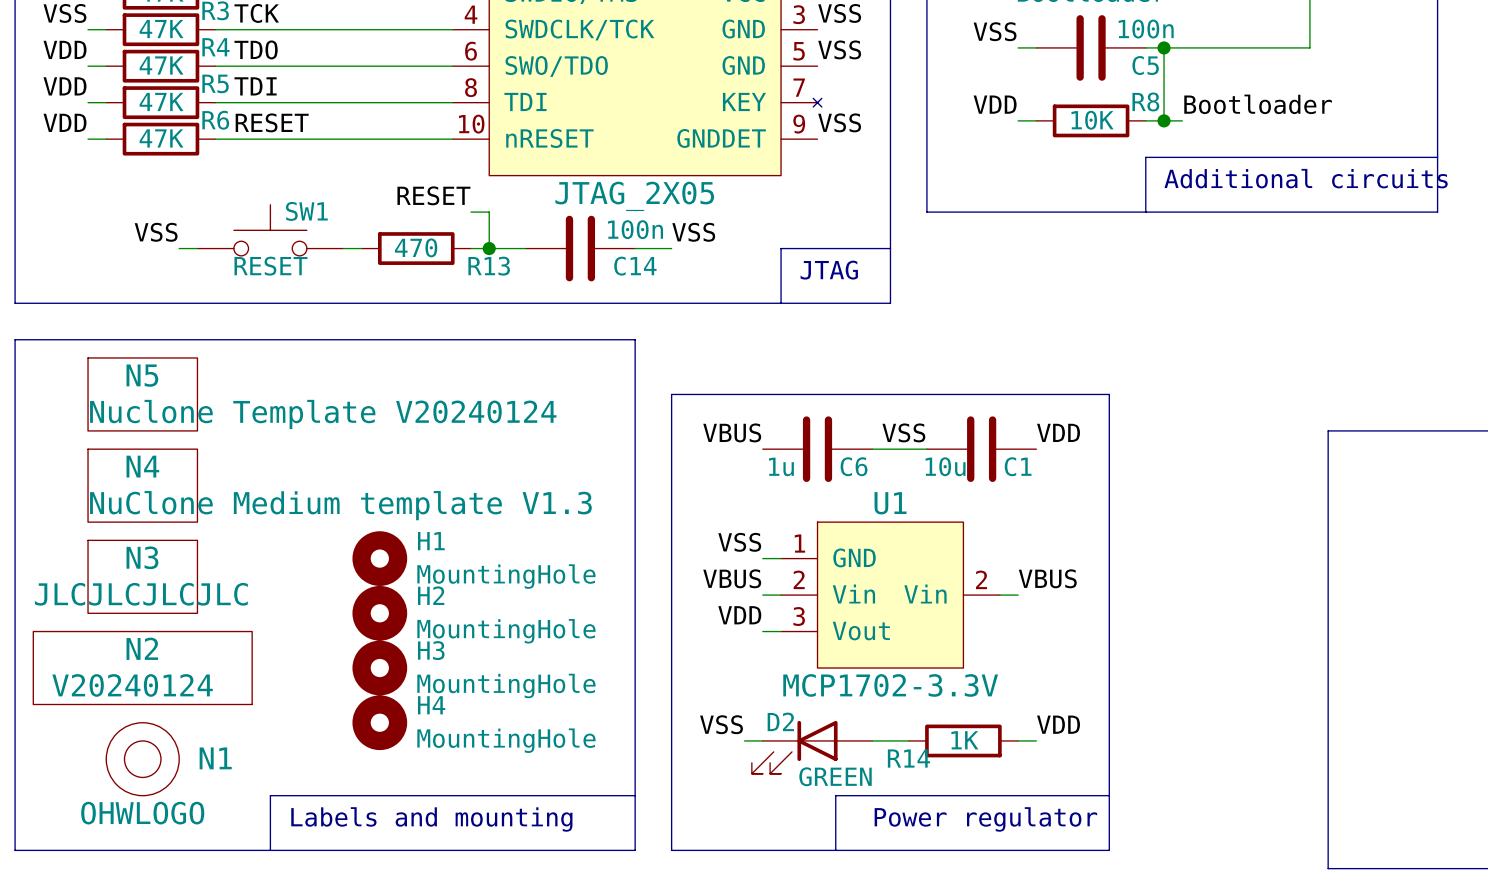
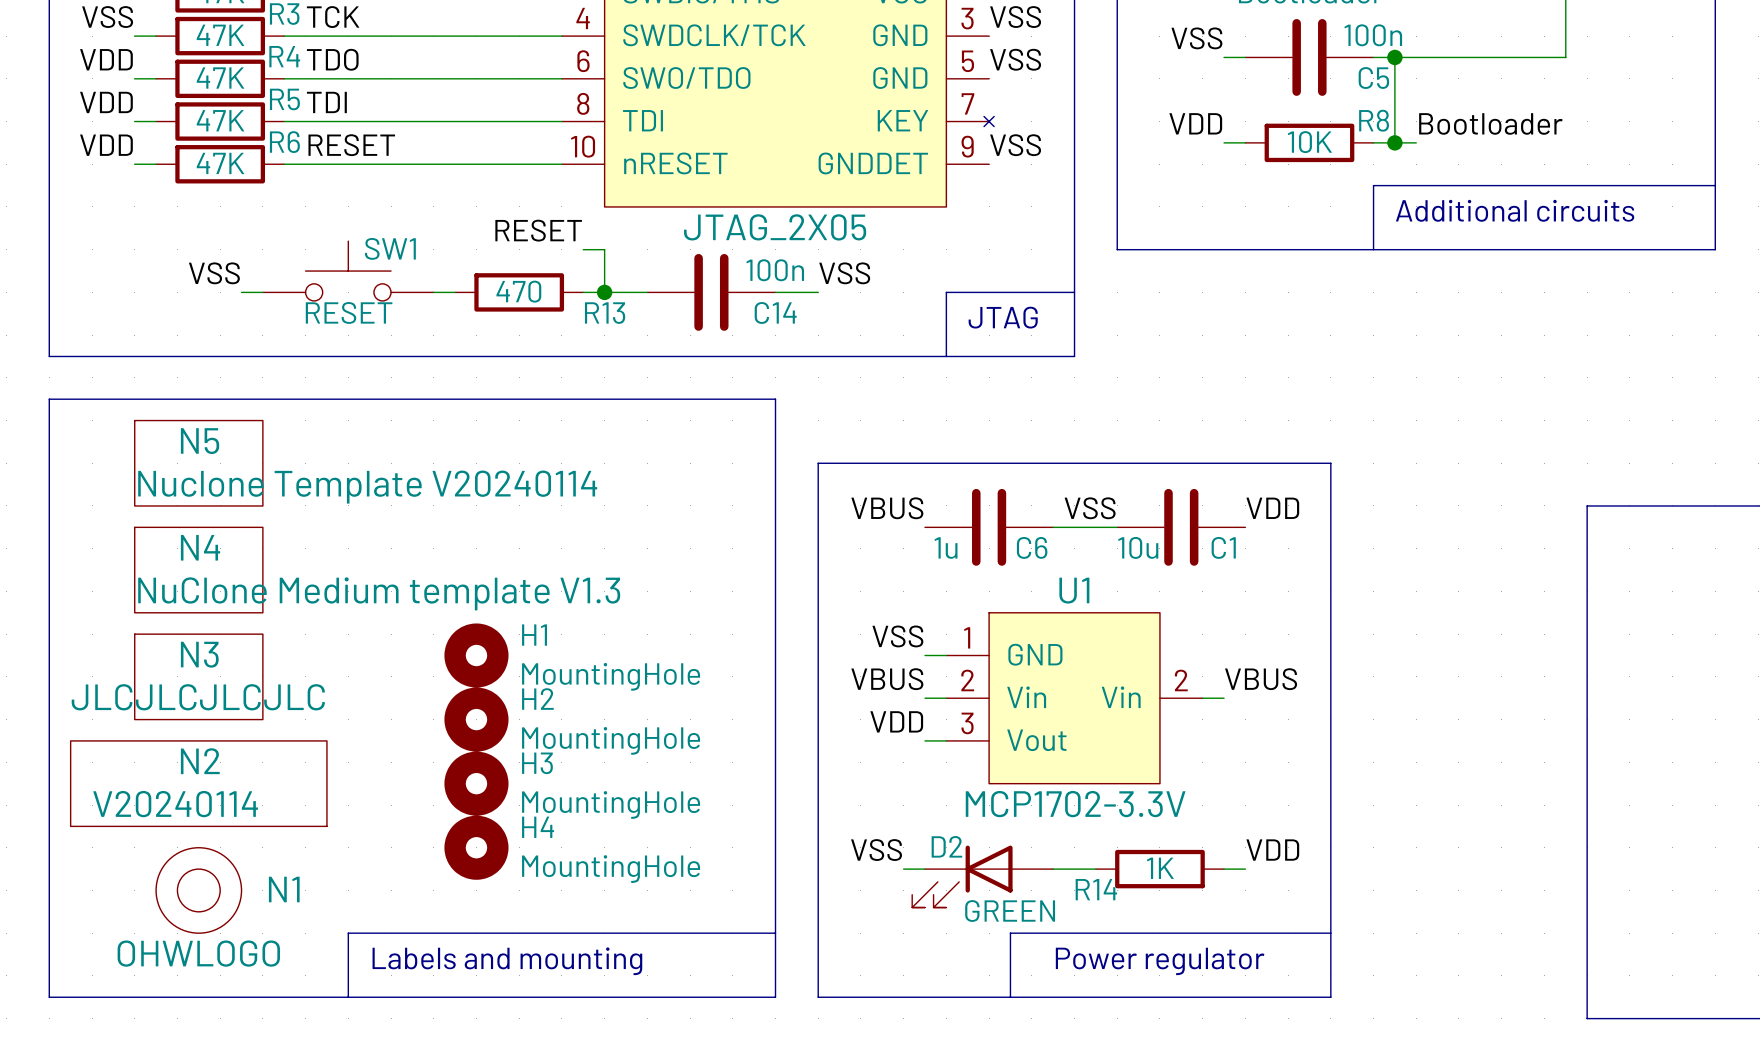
N5 value: Nuclone Template V20240124 (323, 414) -> Nuclone Template V20240114 (367, 487)
N2 value: V20240124 (132, 685) -> V20240114 (175, 804)

